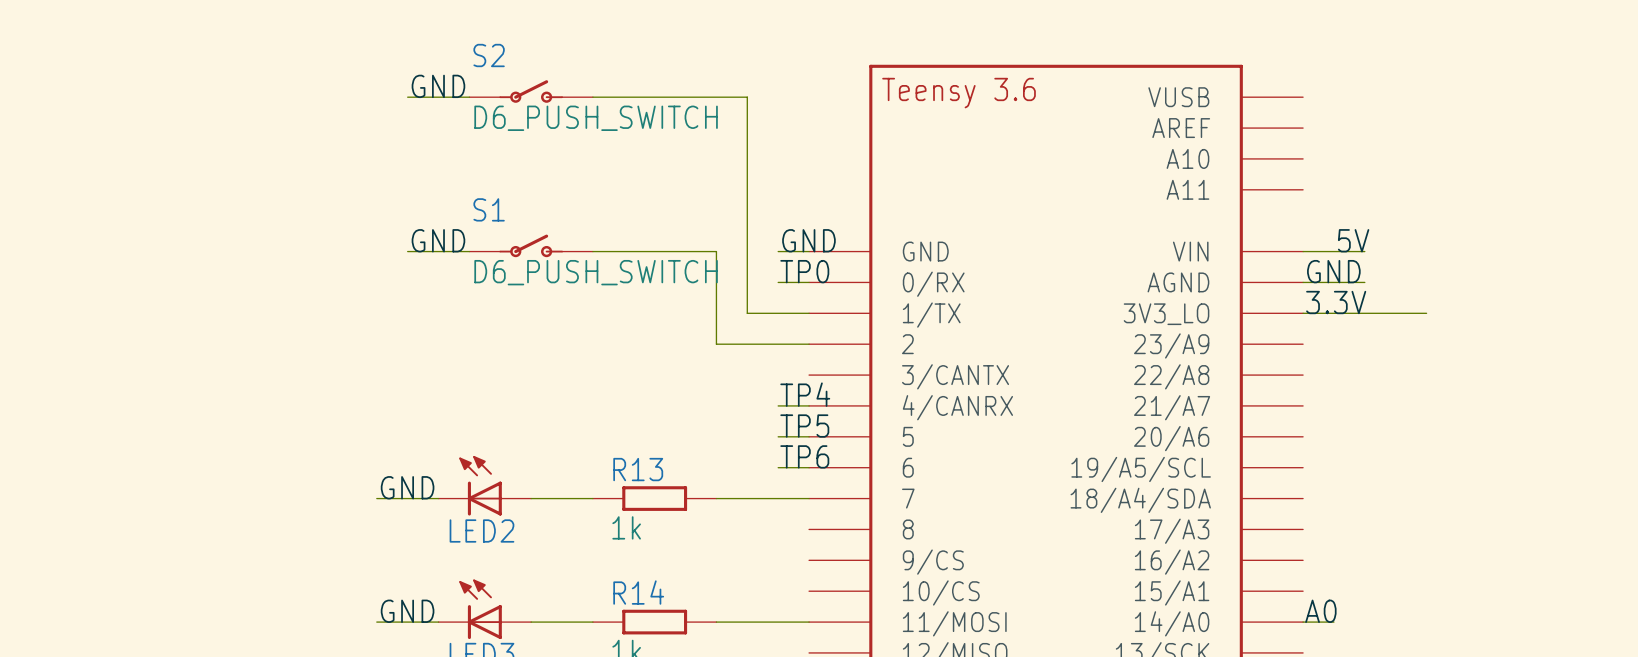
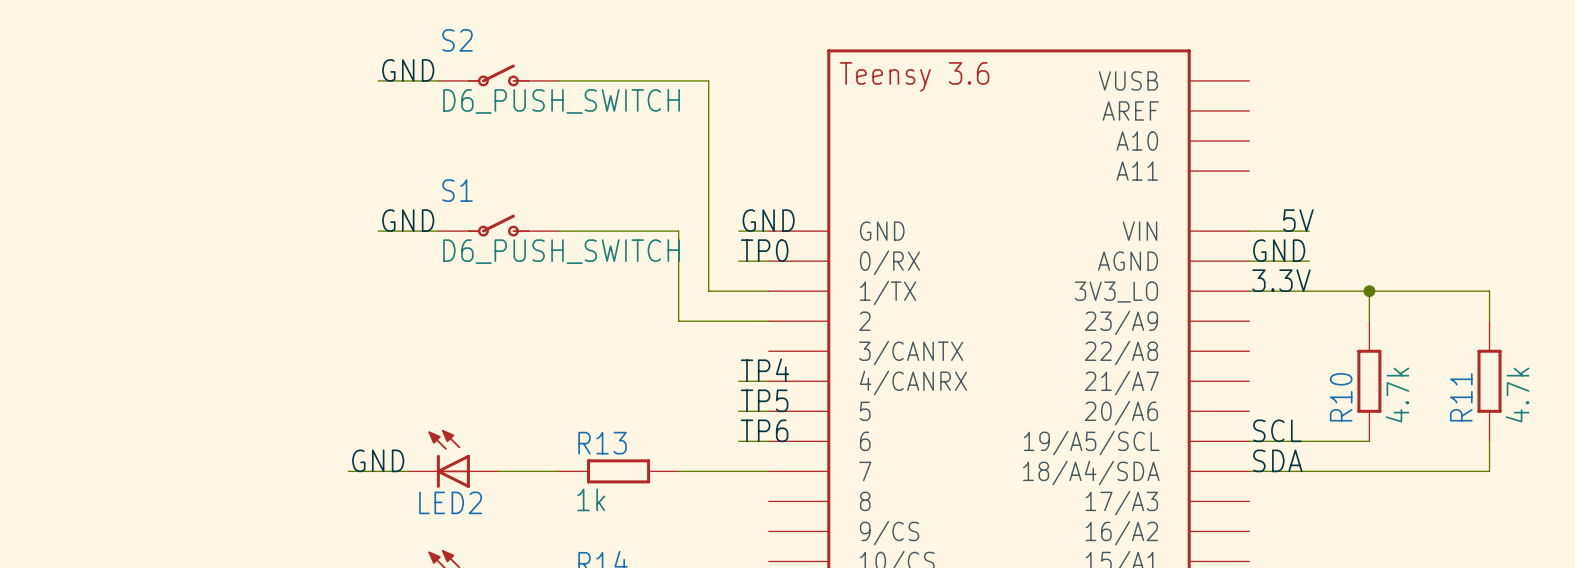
junction: none -> (1369, 291)
wire: none -> (1369, 321) (1369, 291) (1489, 291) (1489, 321)
R10: none -> 4.7k (1369, 381)
R11: none -> 4.7k (1489, 381)
label: none -> SCL (1277, 430)
wire: none -> (1249, 441) (1369, 441)
wire: none -> (1489, 441) (1489, 471) (1249, 471)
label: none -> SDA (1277, 460)

